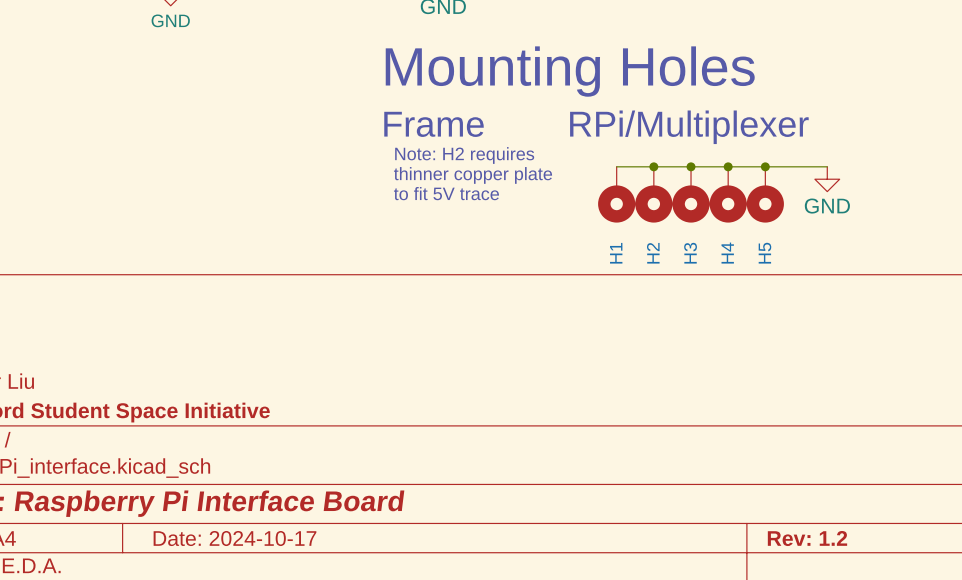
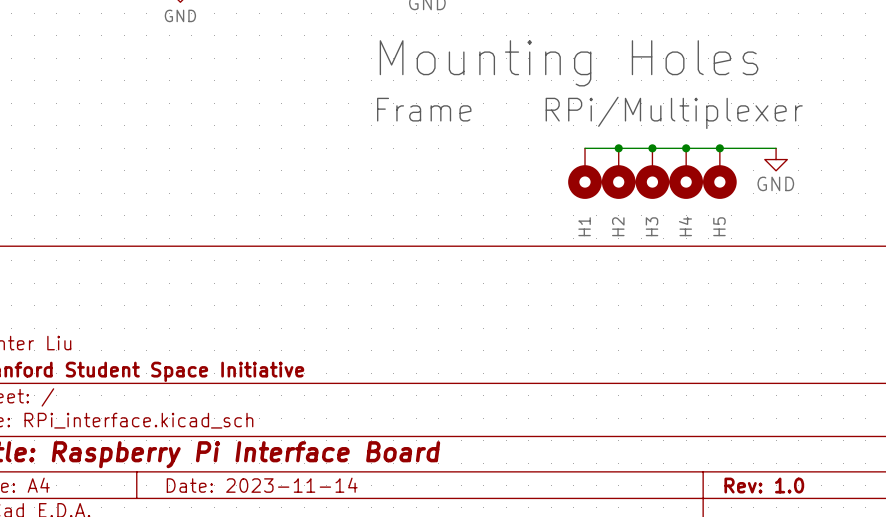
text: Note: H2 requires (464, 155) -> none
text: thinner copper plate (473, 175) -> none
text: to fit 5V trace (446, 193) -> none
title block: Date: 2024-10-17 (234, 538) -> Date: 2023-11-14 (262, 485)
title block: Rev: 1.2 (807, 538) -> Rev: 1.0 (764, 485)

